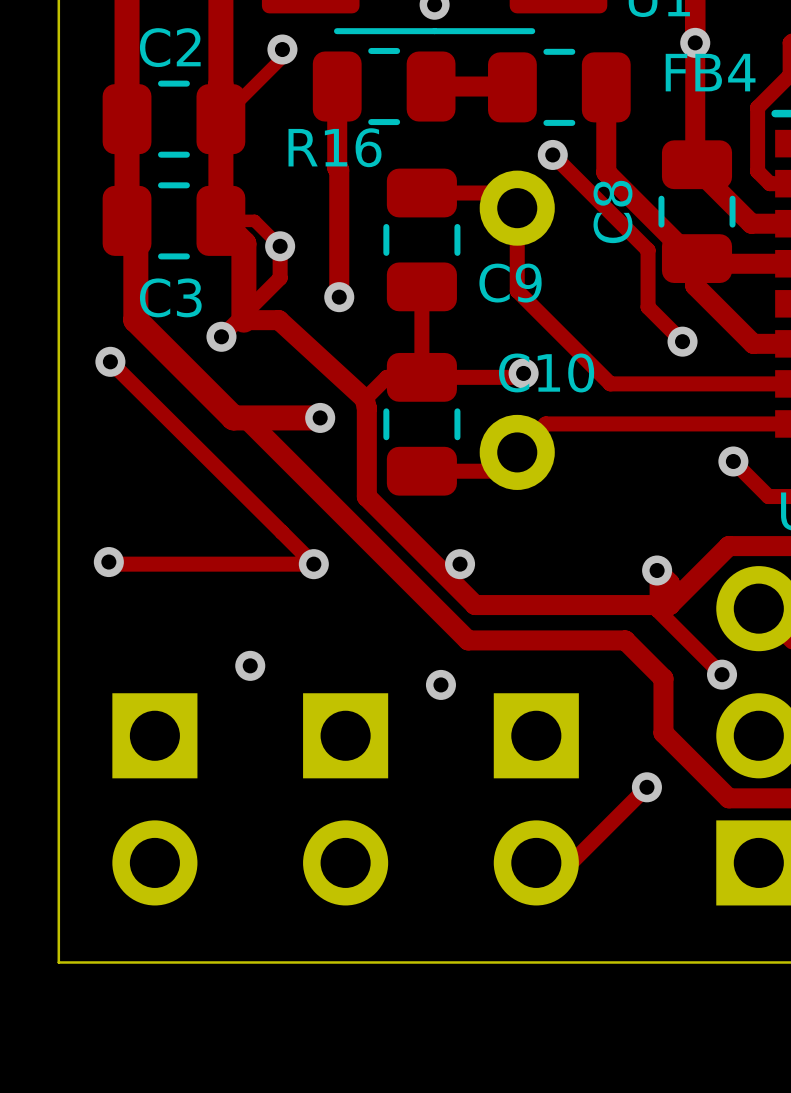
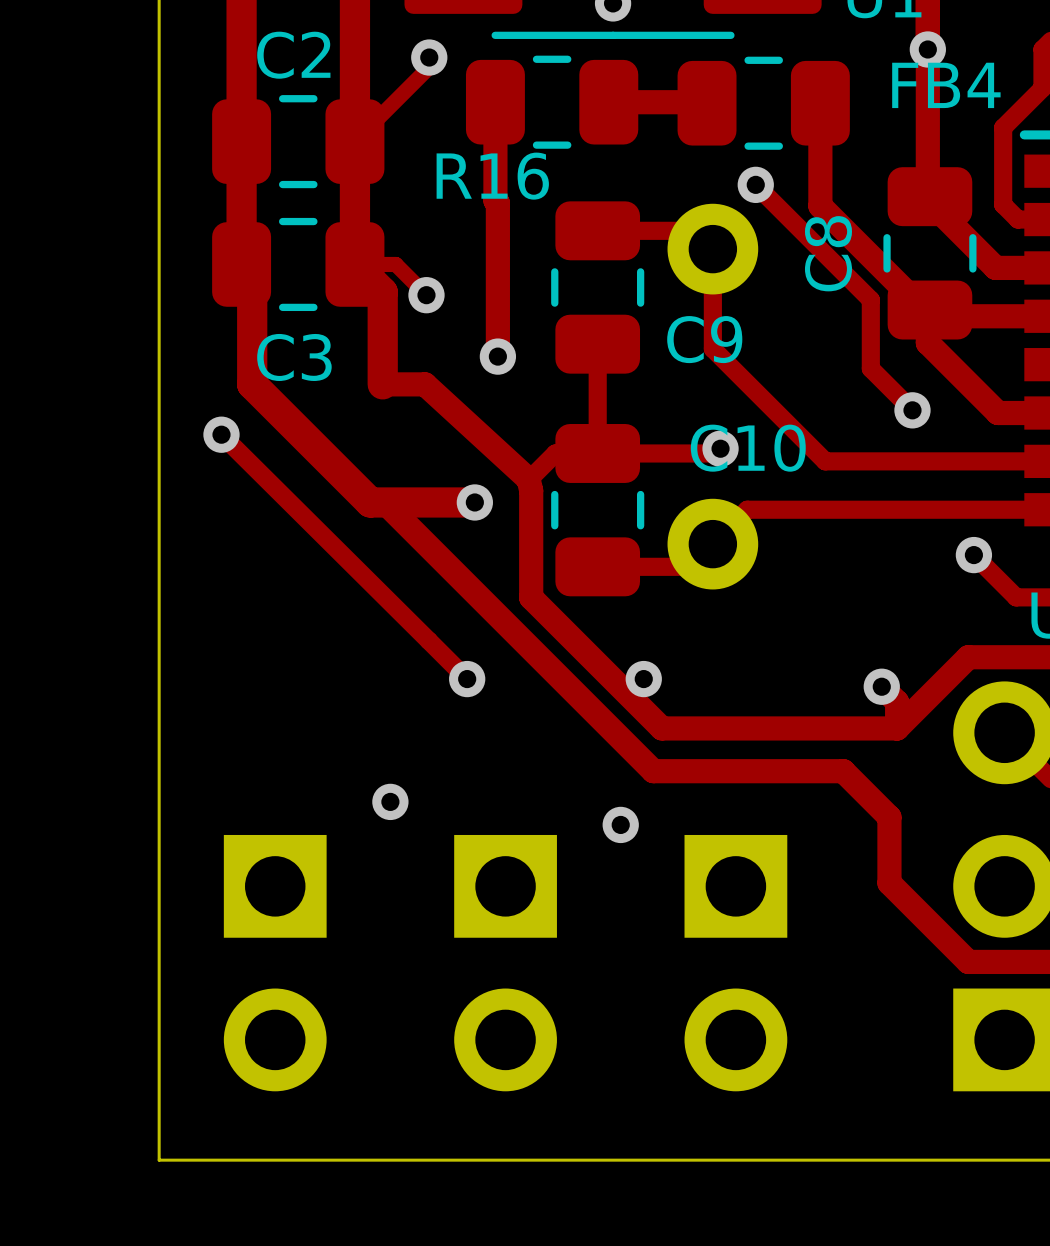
track: (280, 246) (280, 278) (221, 336) -> none
via: (221, 336) -> none
track: (108, 562) (110, 564) (313, 564) -> none
via: (108, 562) -> none
track: (657, 570) (657, 609) (722, 674) -> none
via: (722, 674) -> none
track: (646, 787) (571, 862) (536, 862) -> none
via: (646, 787) -> none

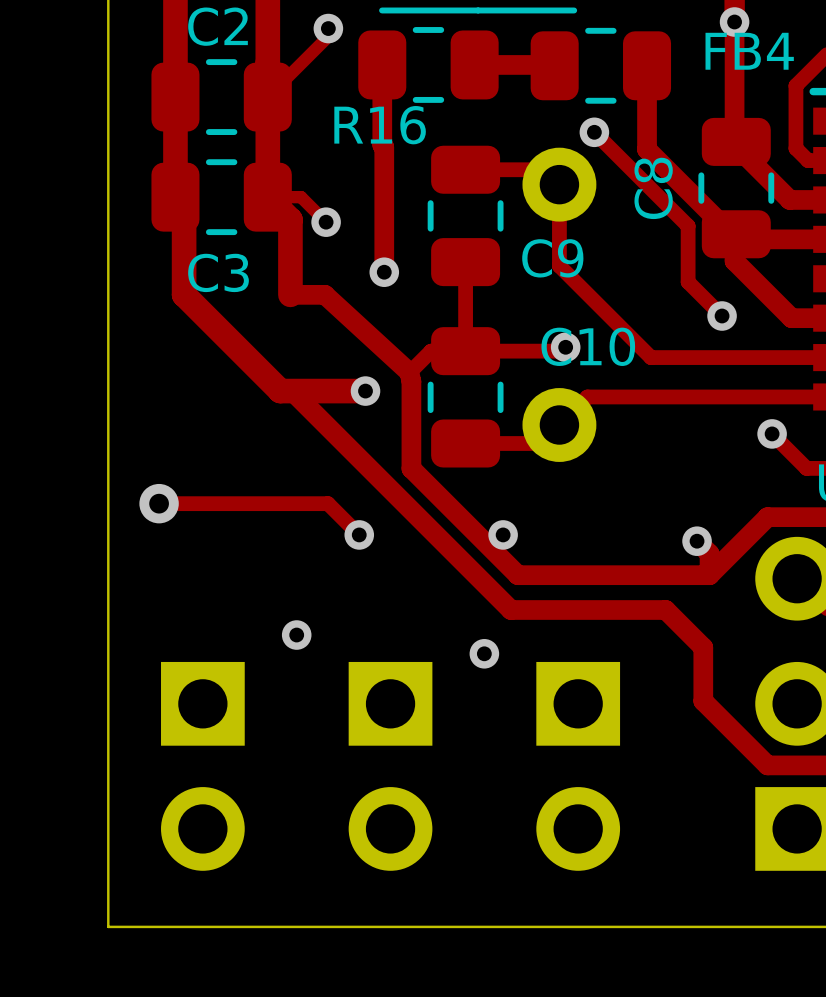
track: (221, 434) (428, 640) -> (159, 503) (327, 503)
via: (221, 434) -> none
via: none -> (159, 503)

